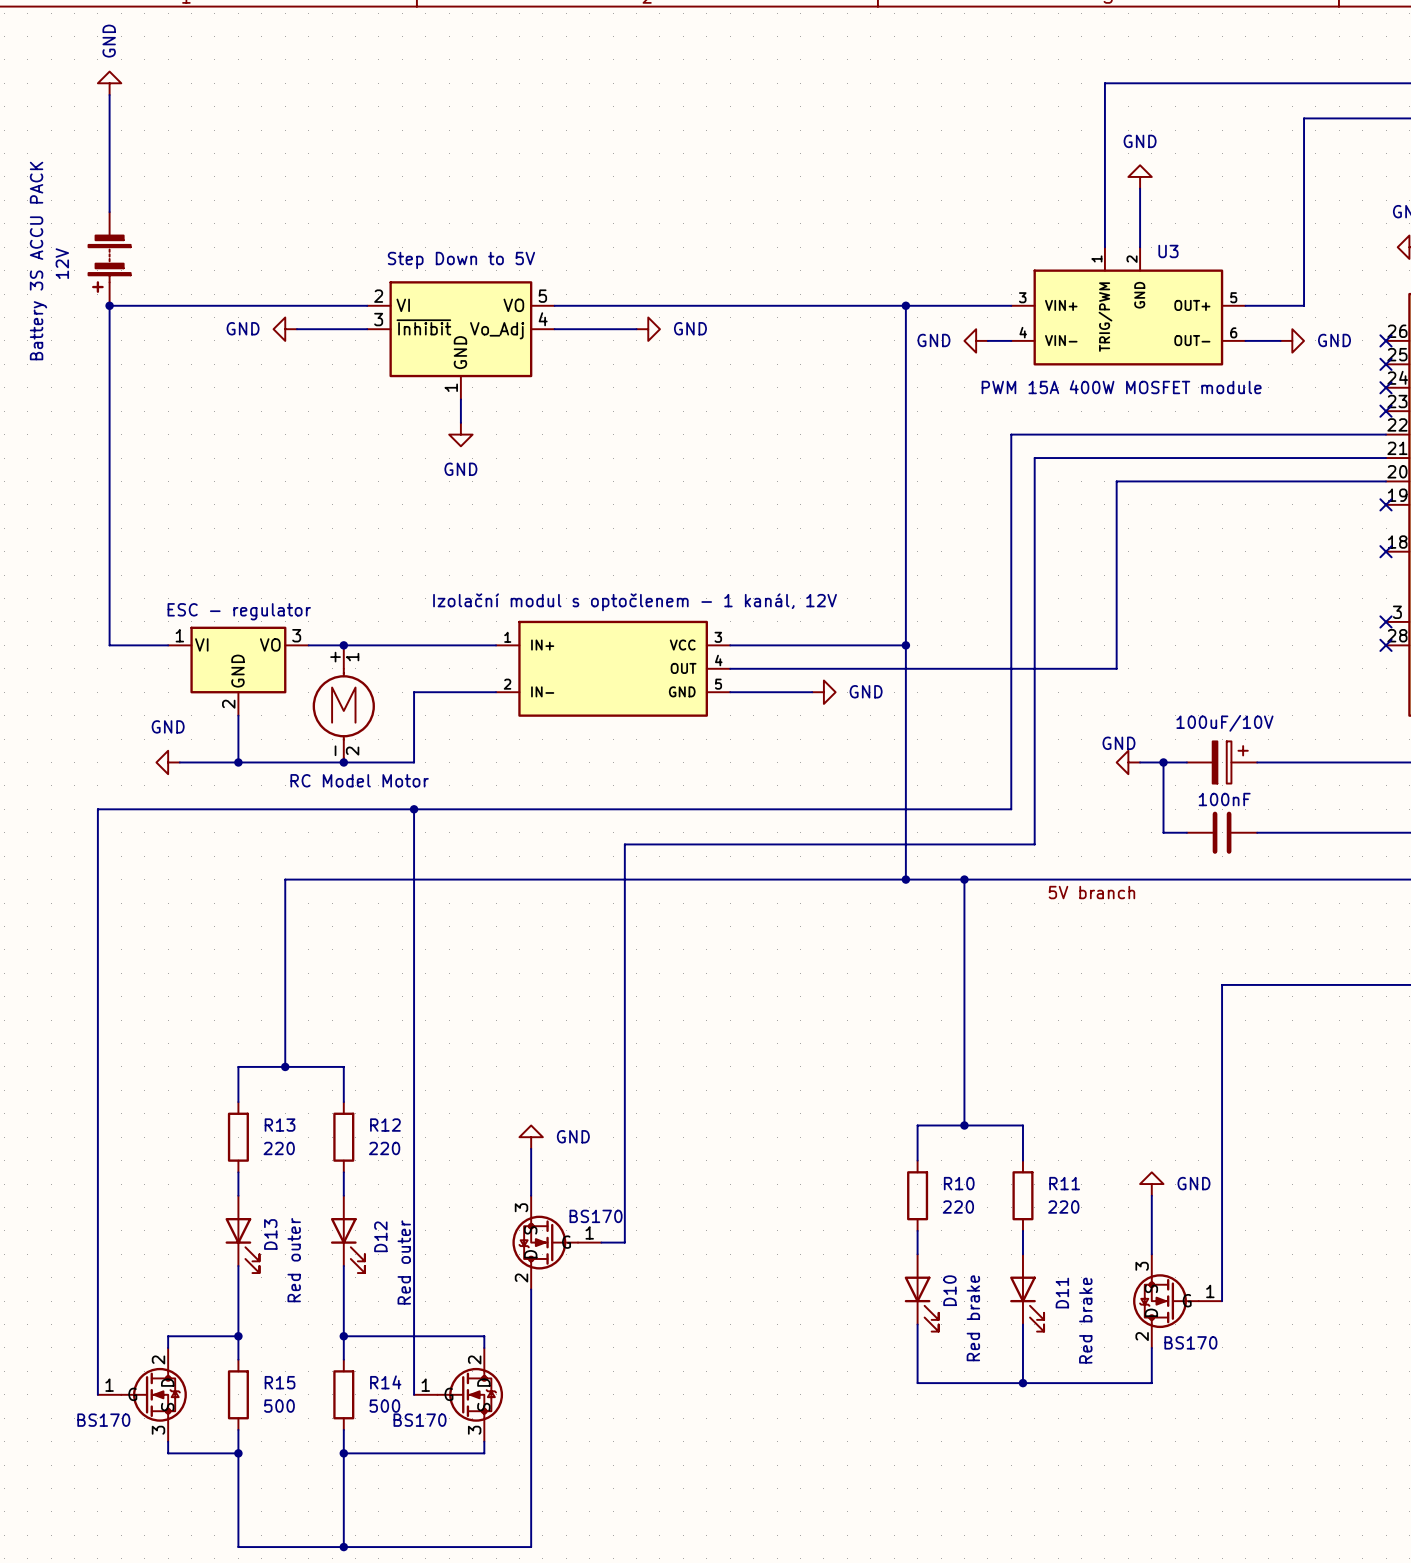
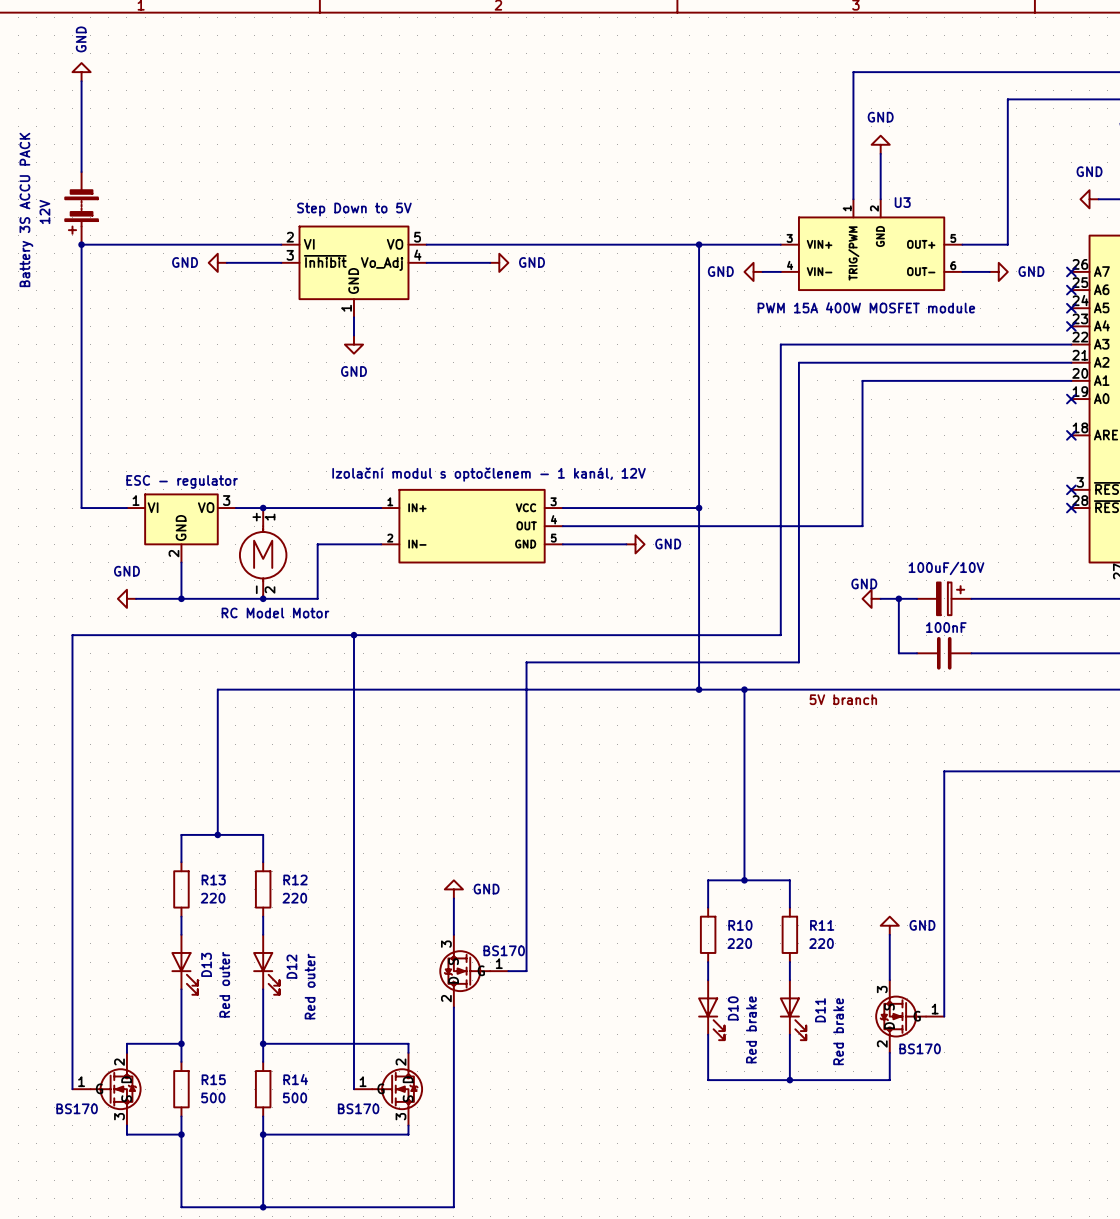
wire: (414, 809) (414, 1394) -> (353, 635) (353, 1089)
junction position: (414, 809) -> (353, 635)
wire: (683, 844) (624, 844) (624, 1242) (601, 1242) -> (526, 662) (526, 971) (508, 971)
power symbol position: GND (531, 1137) -> GND (453, 889)
wire: (531, 1148) (531, 1195) -> (453, 898) (453, 934)
part position: (556, 1242) -> (473, 971)
wire: (531, 1289) (531, 1336) -> none
wire: (484, 1336) (484, 1347) -> (372, 1043) (408, 1043)
part position: (458, 1394) -> (388, 1089)
wire: (484, 1441) (484, 1453) -> (408, 1134) (372, 1134)
wire: (531, 1453) (531, 1547) -> (453, 1007) (453, 1207) (408, 1207)

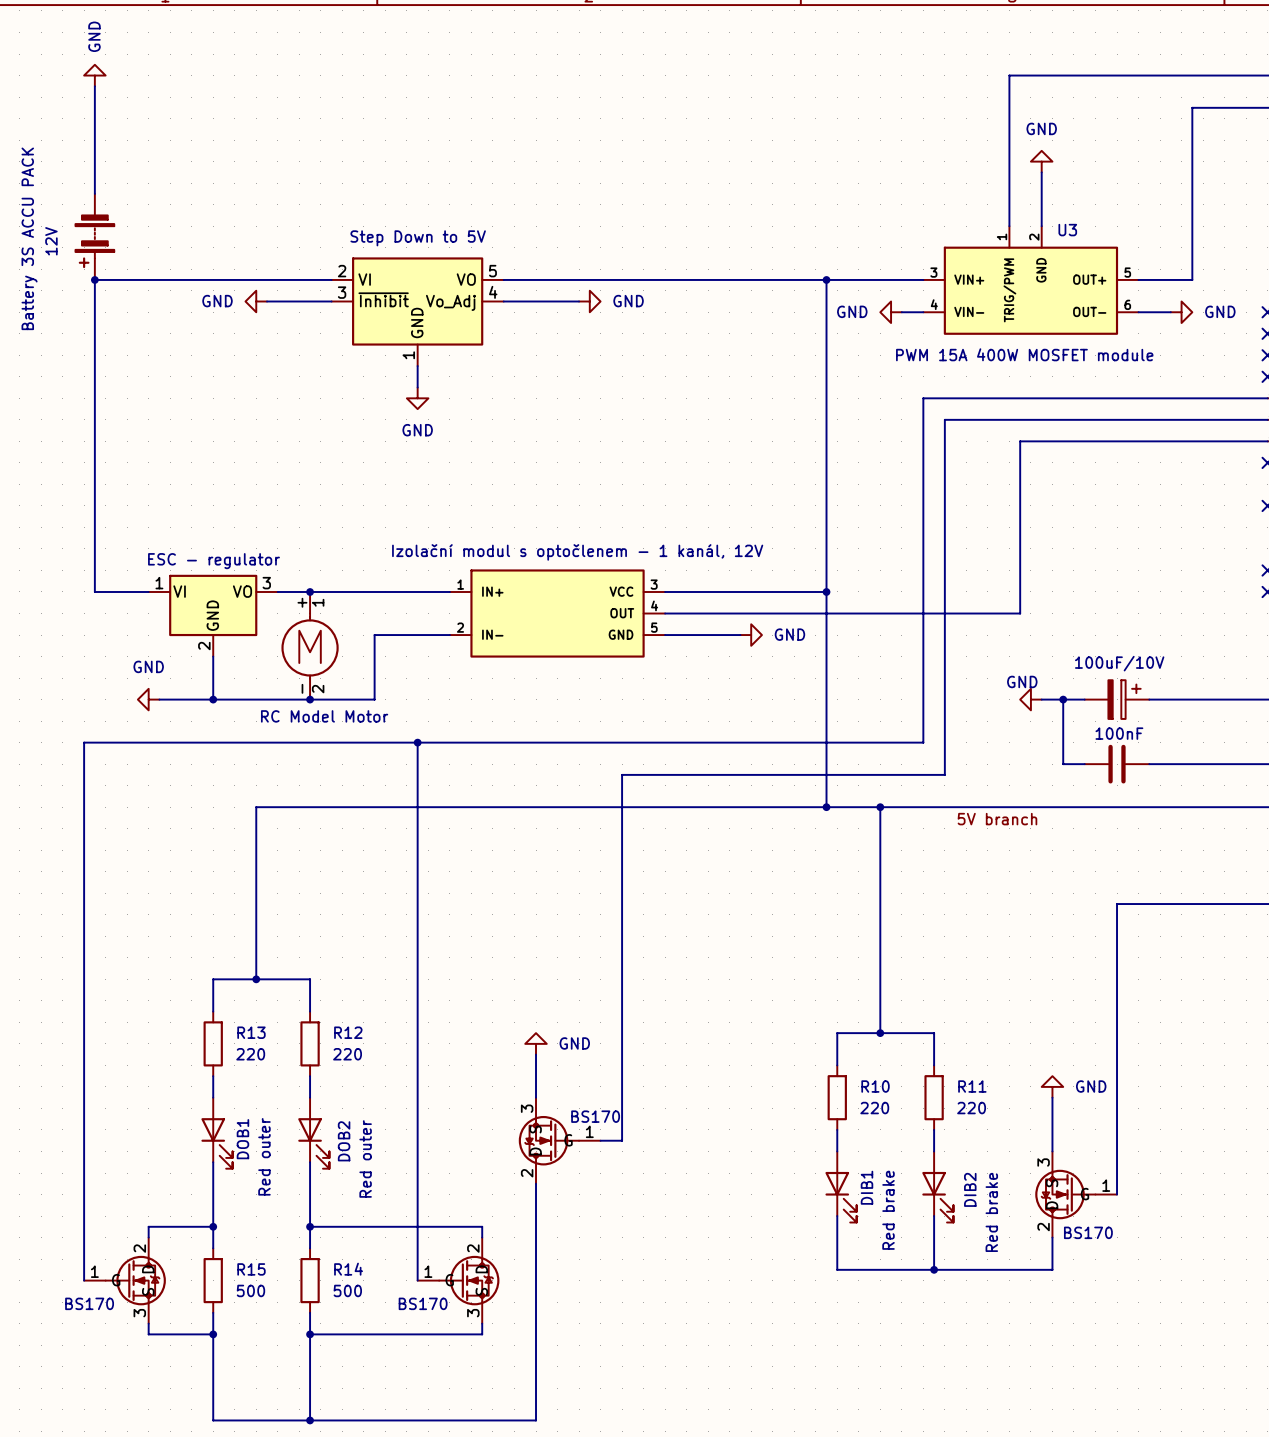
D13 name: D13 (206, 964) -> DOB1 (242, 1139)
D12 name: D12 (291, 966) -> DOB2 (344, 1141)
D10 name: D10 (733, 1008) -> DIB1 (866, 1187)
D11 name: D11 (820, 1010) -> DIB2 (970, 1189)

